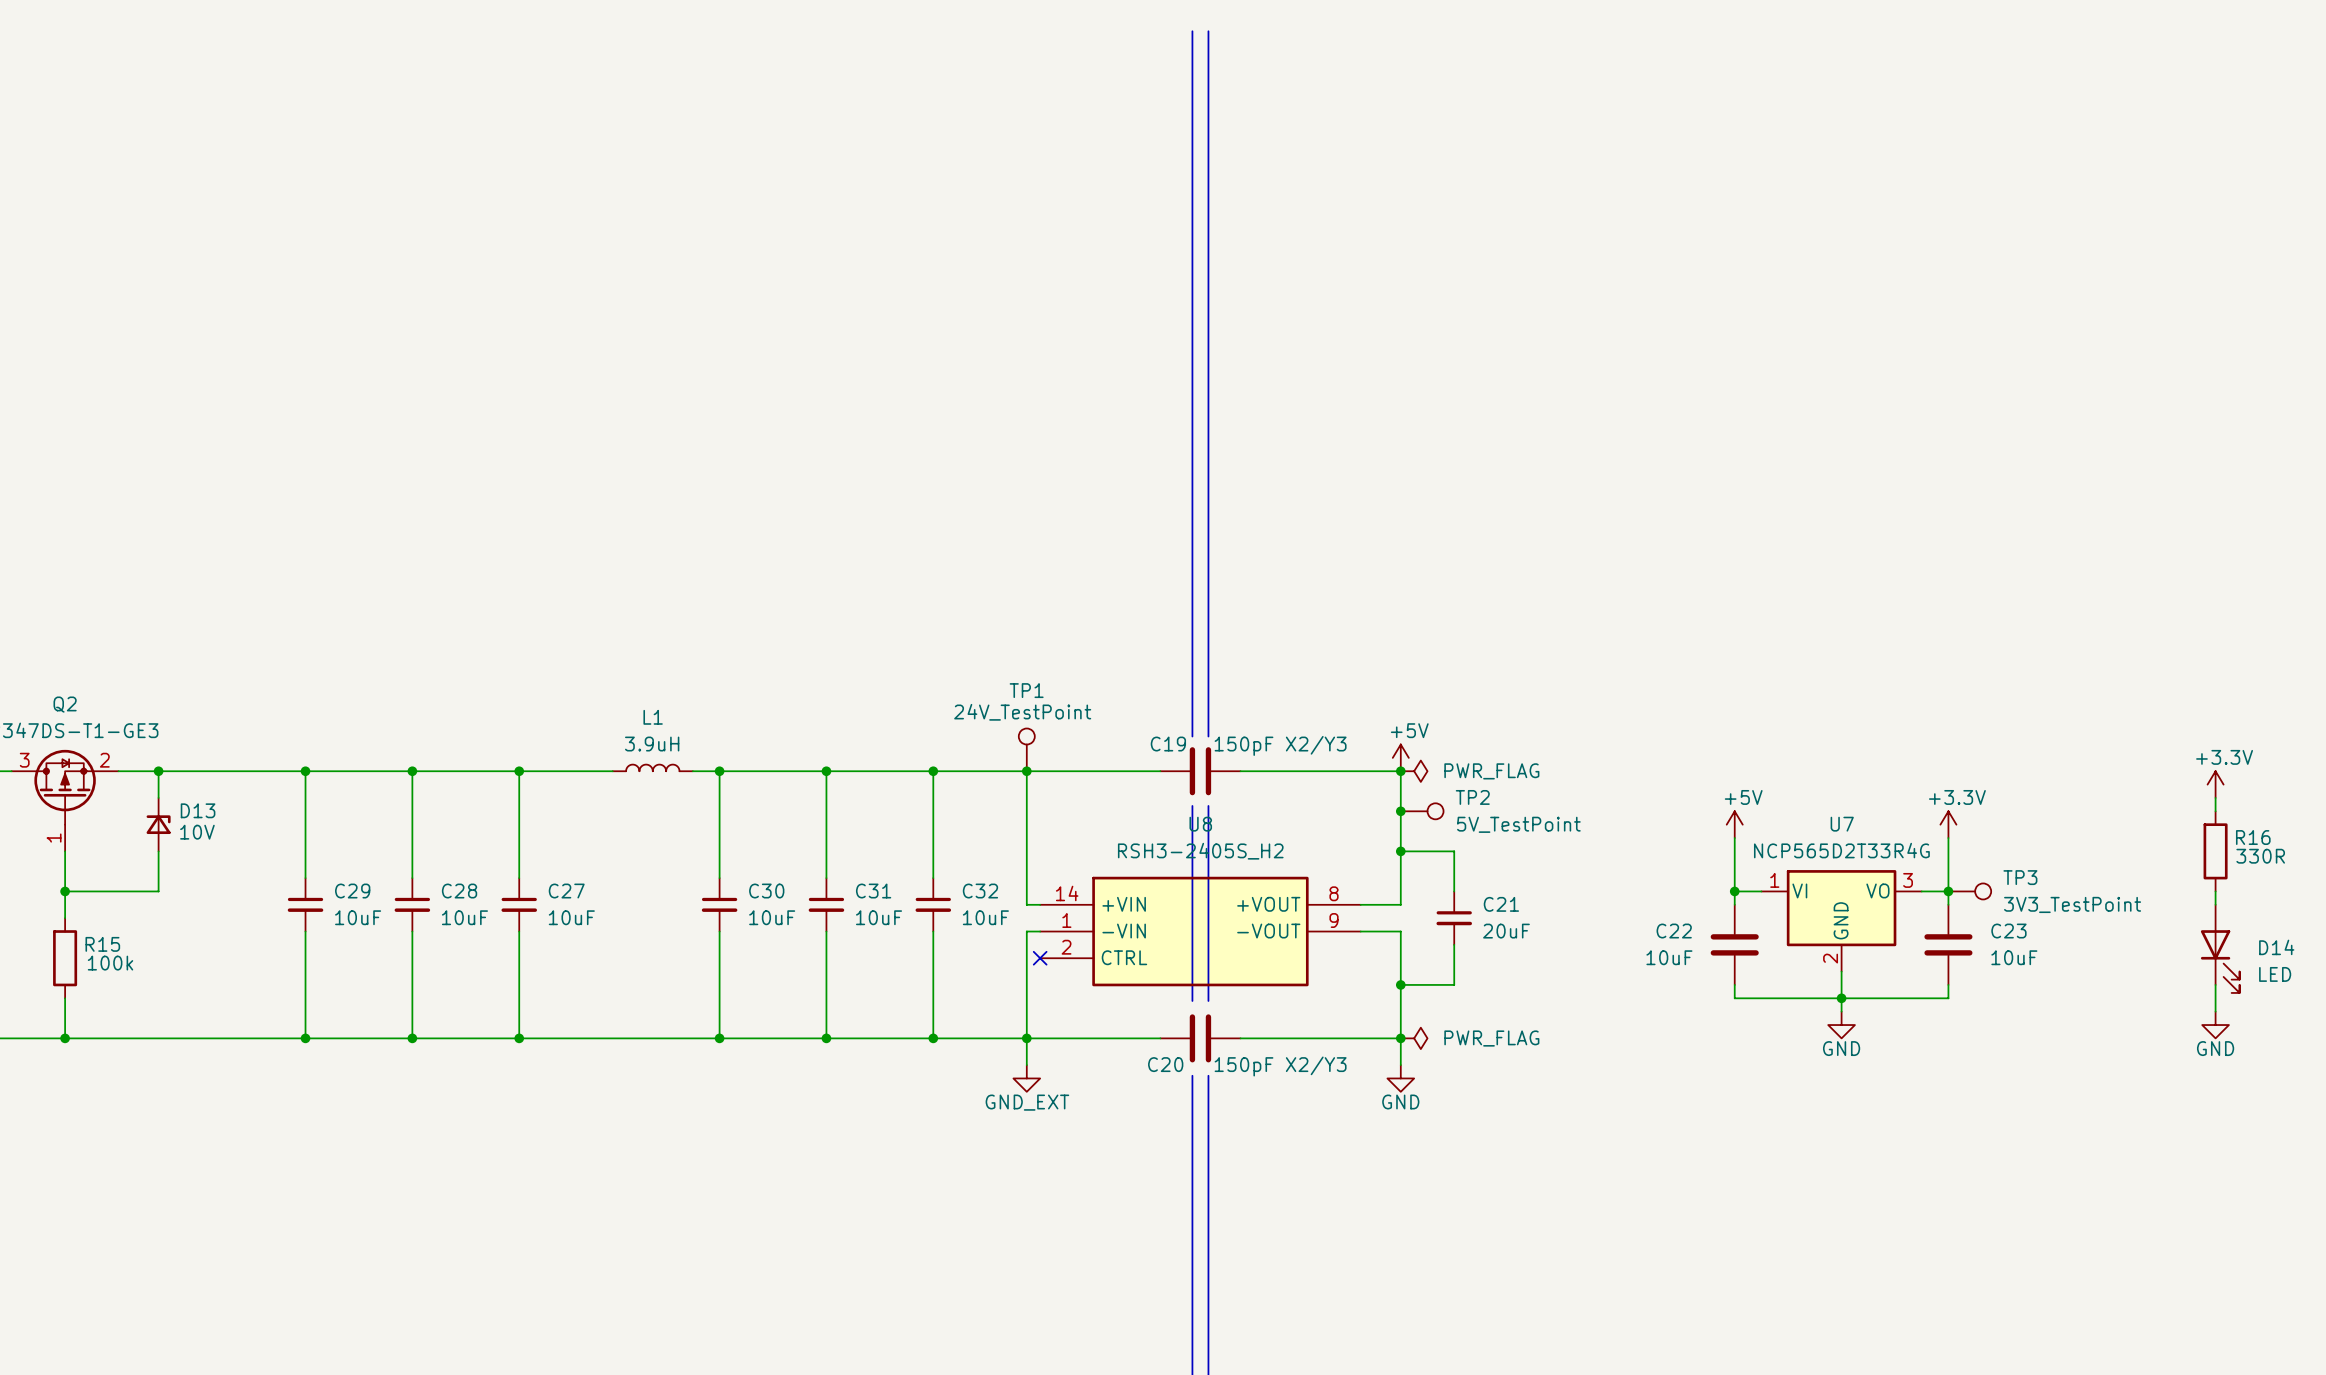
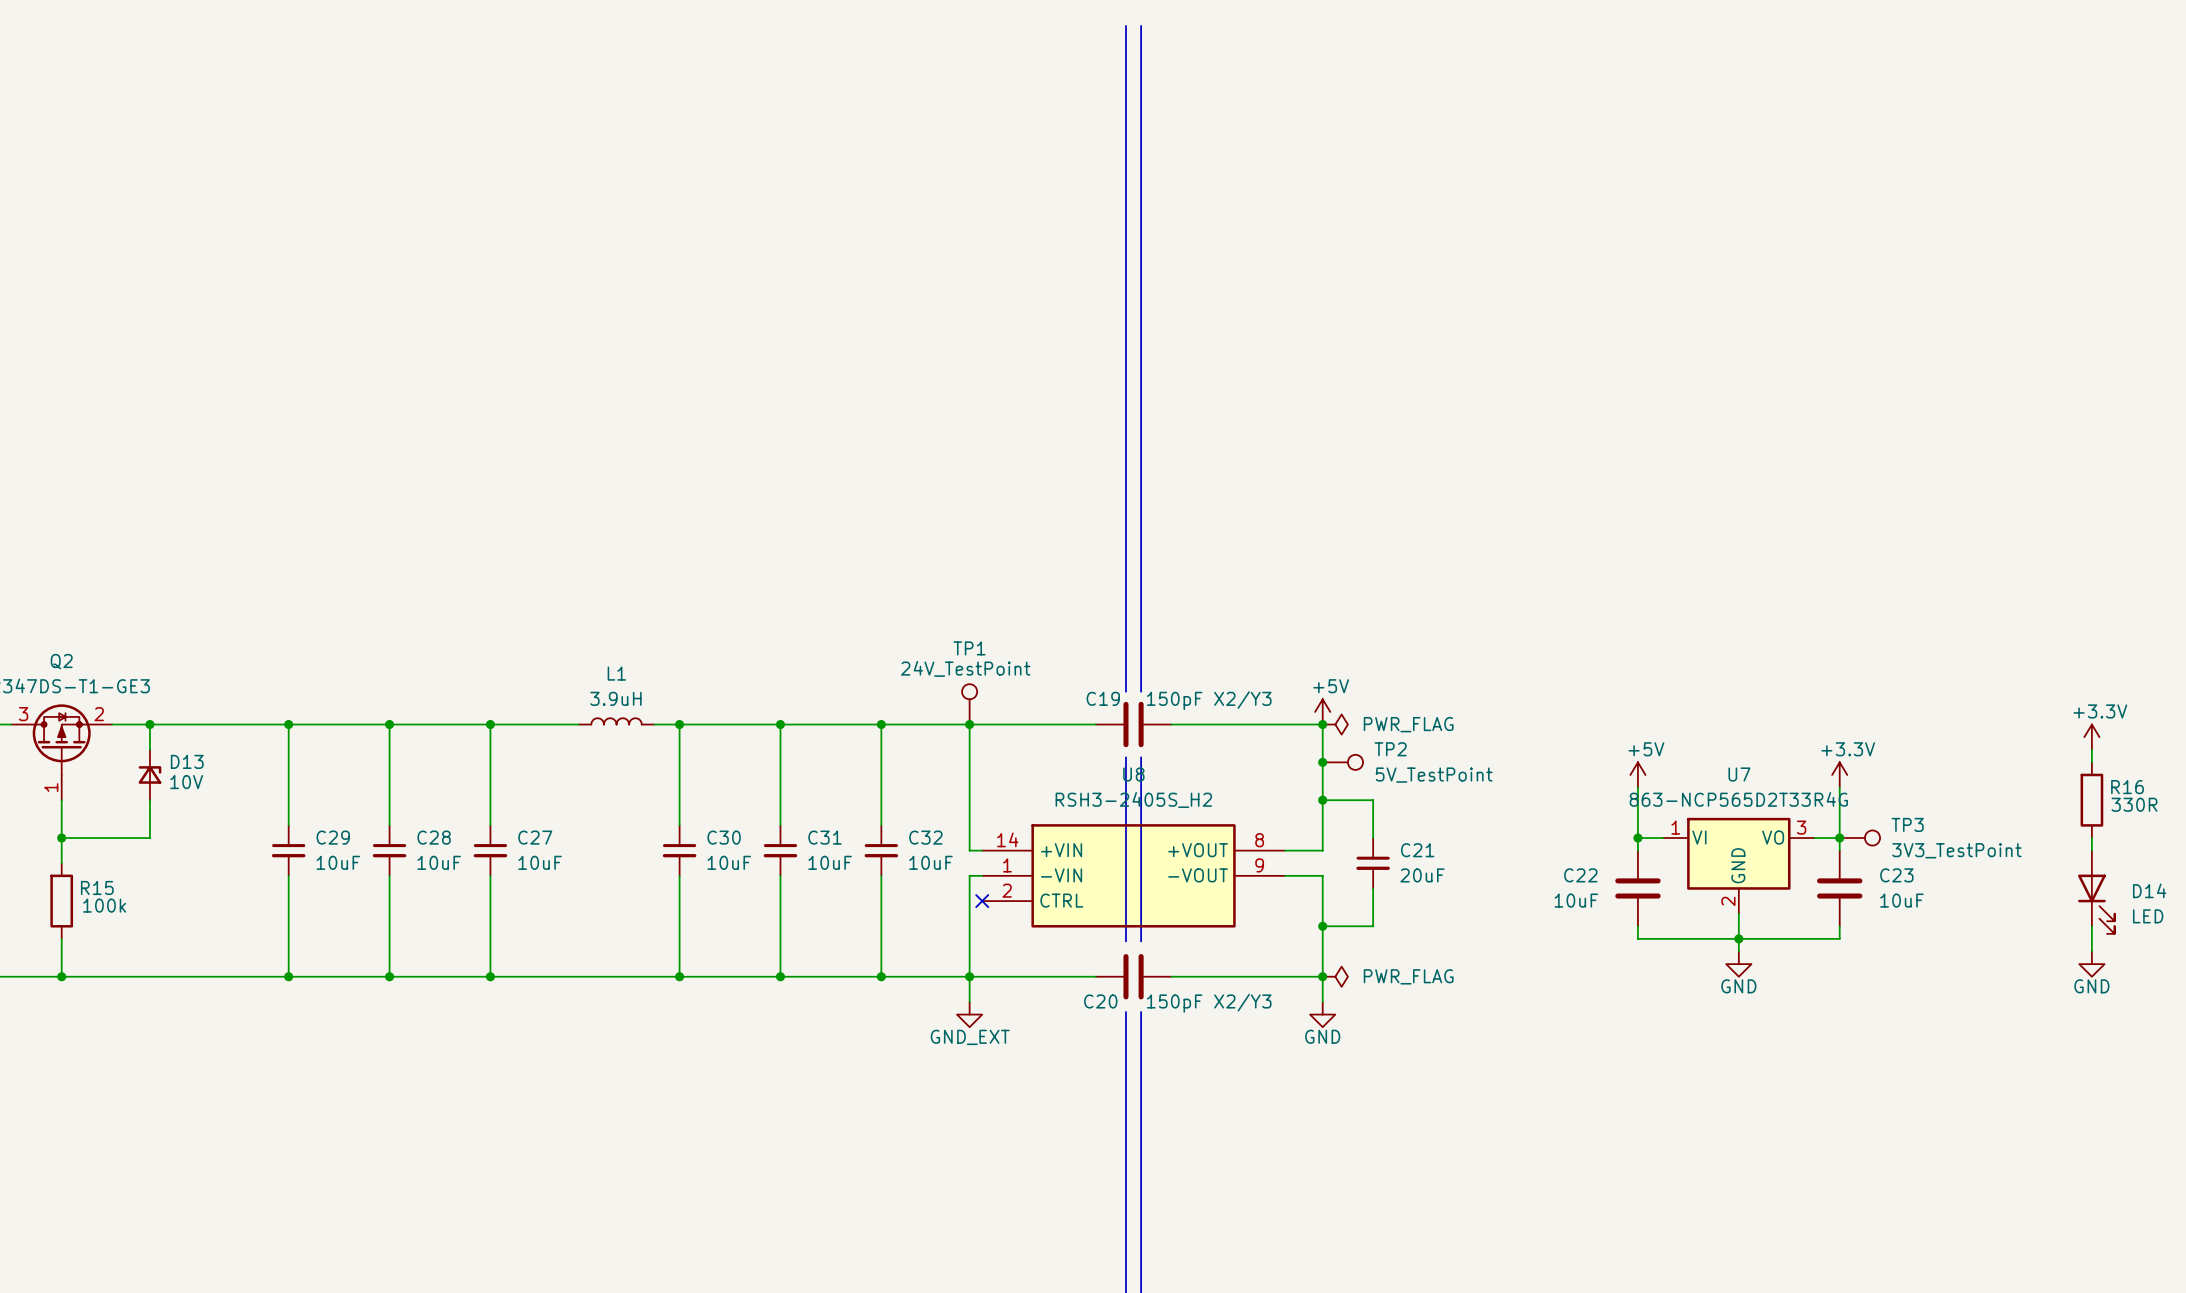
U7 value: NCP565D2T33R4G (1841, 850) -> 863-NCP565D2T33R4G (1738, 799)

